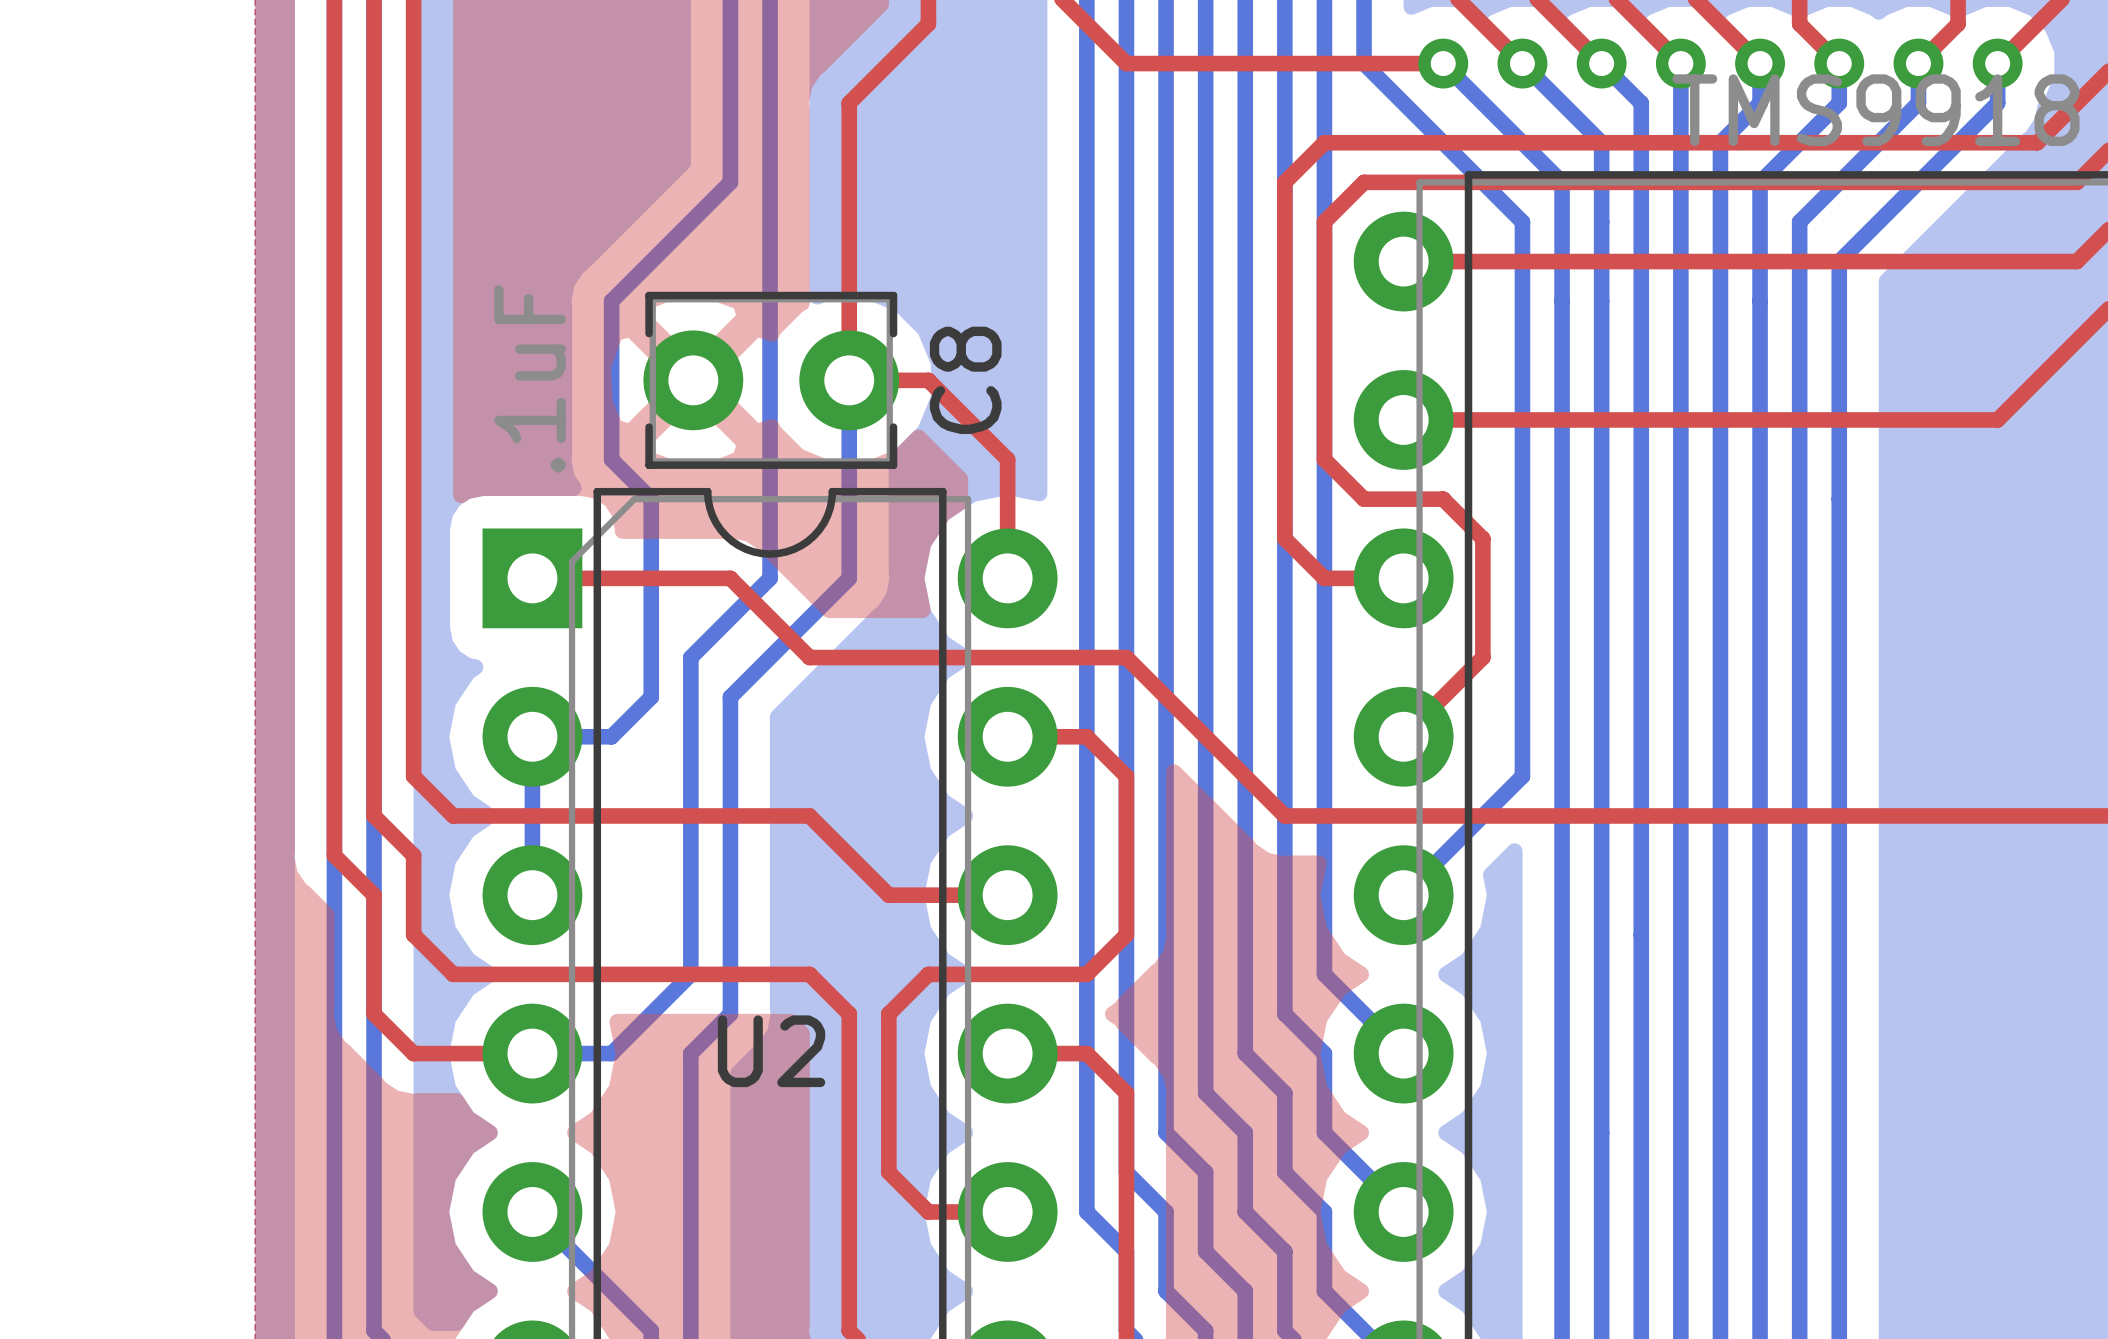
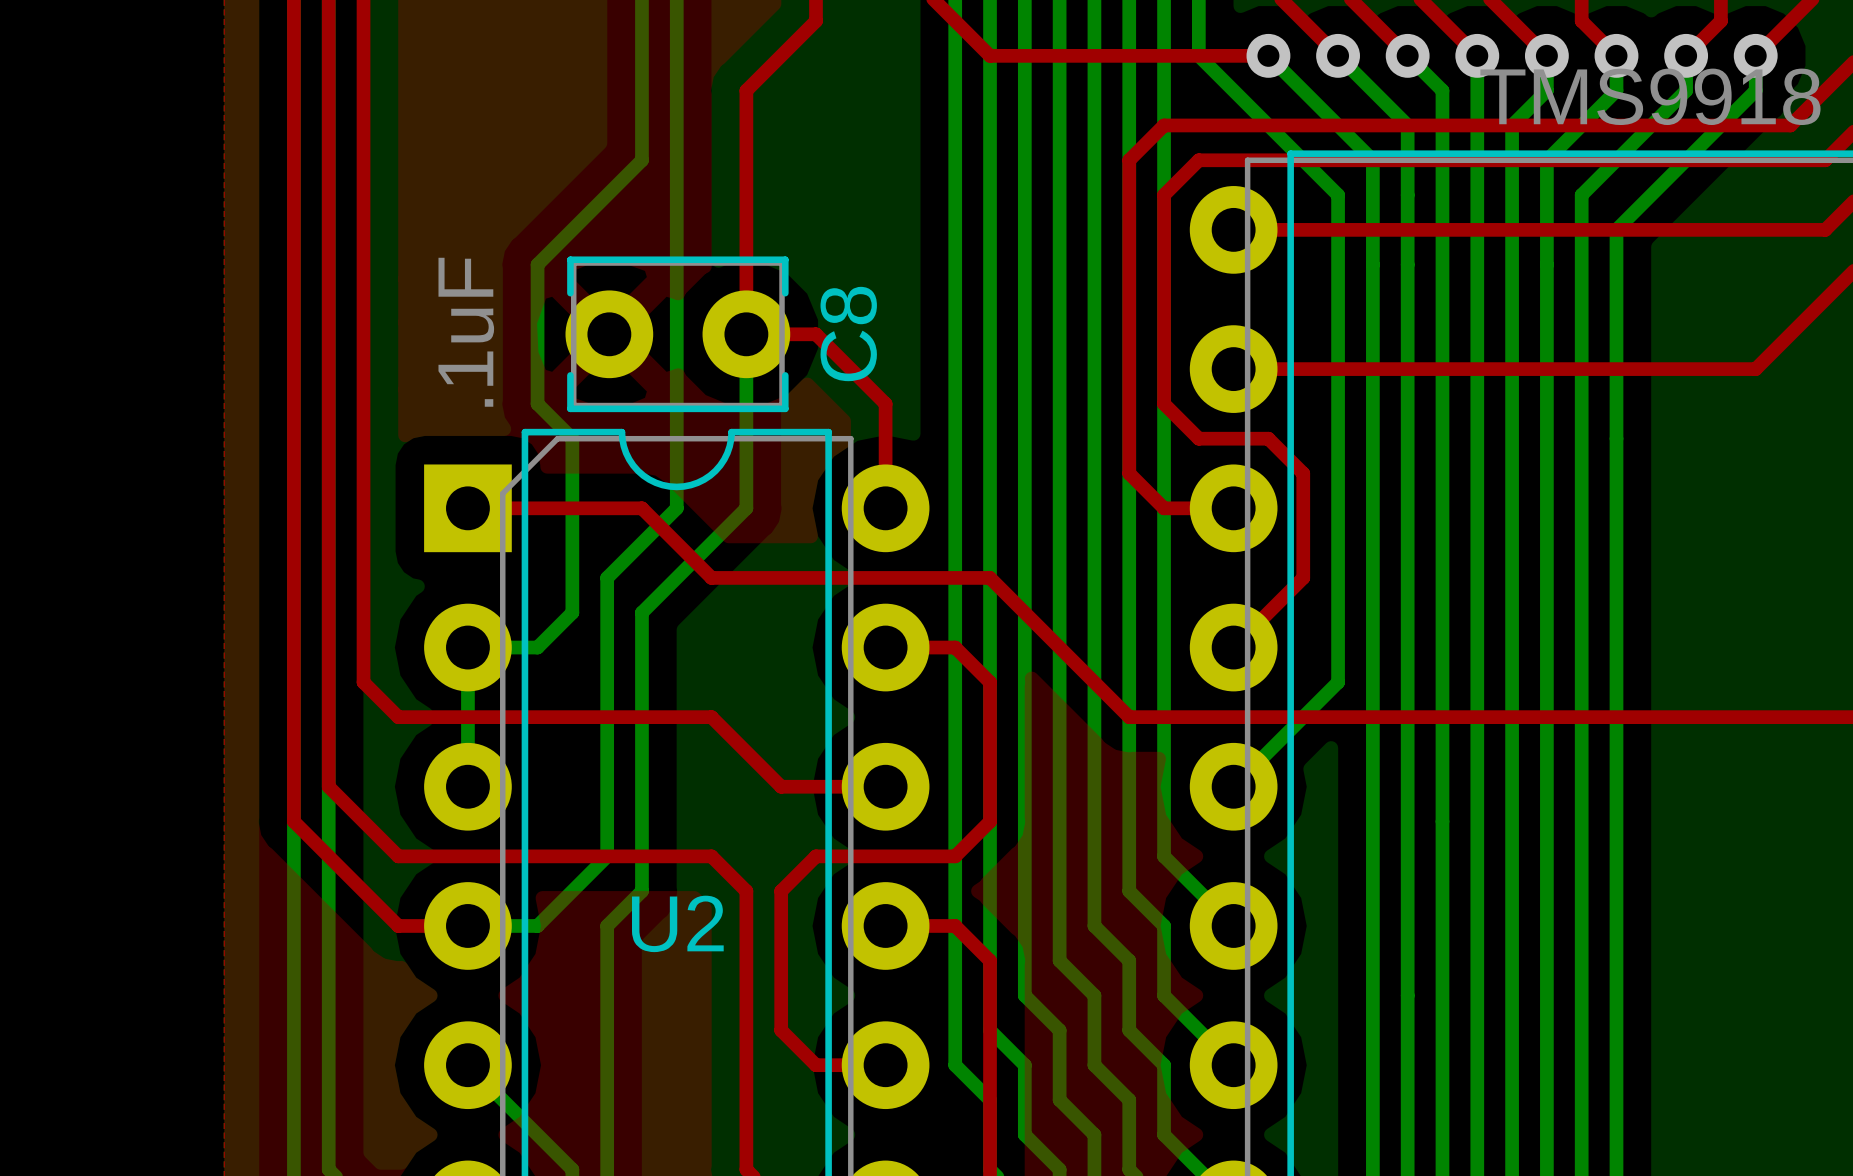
top track: (374, 815) (413, 855) (413, 934) -> (328, 717) (328, 786) (363, 821)
top track: (334, 855) (374, 895) (374, 1013) (413, 1053) (453, 1053) -> (293, 751) (293, 821) (398, 925)

